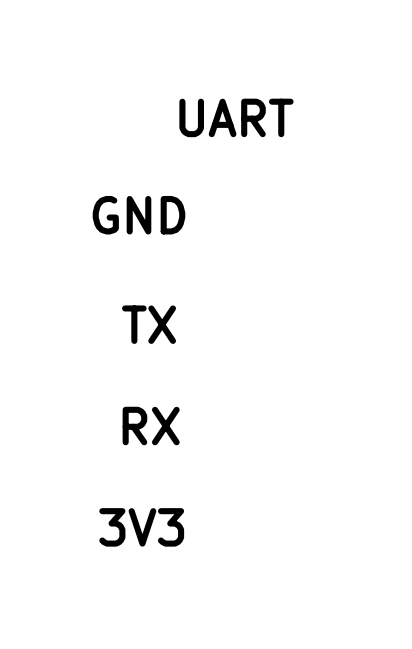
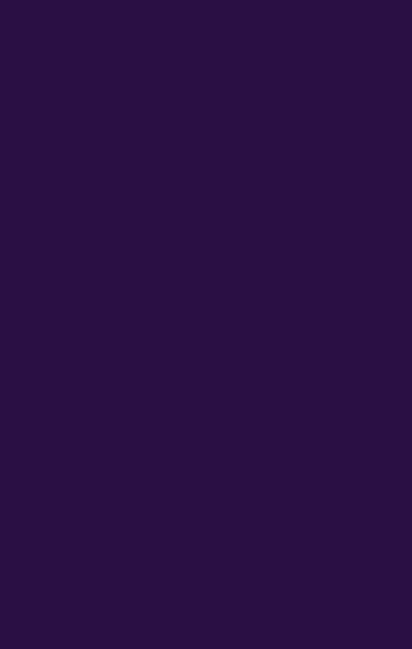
text: UART (236, 117) -> none
text: GND (138, 215) -> none
text: TX (149, 324) -> none
text: RX (151, 426) -> none
text: 3V3 (141, 527) -> none

